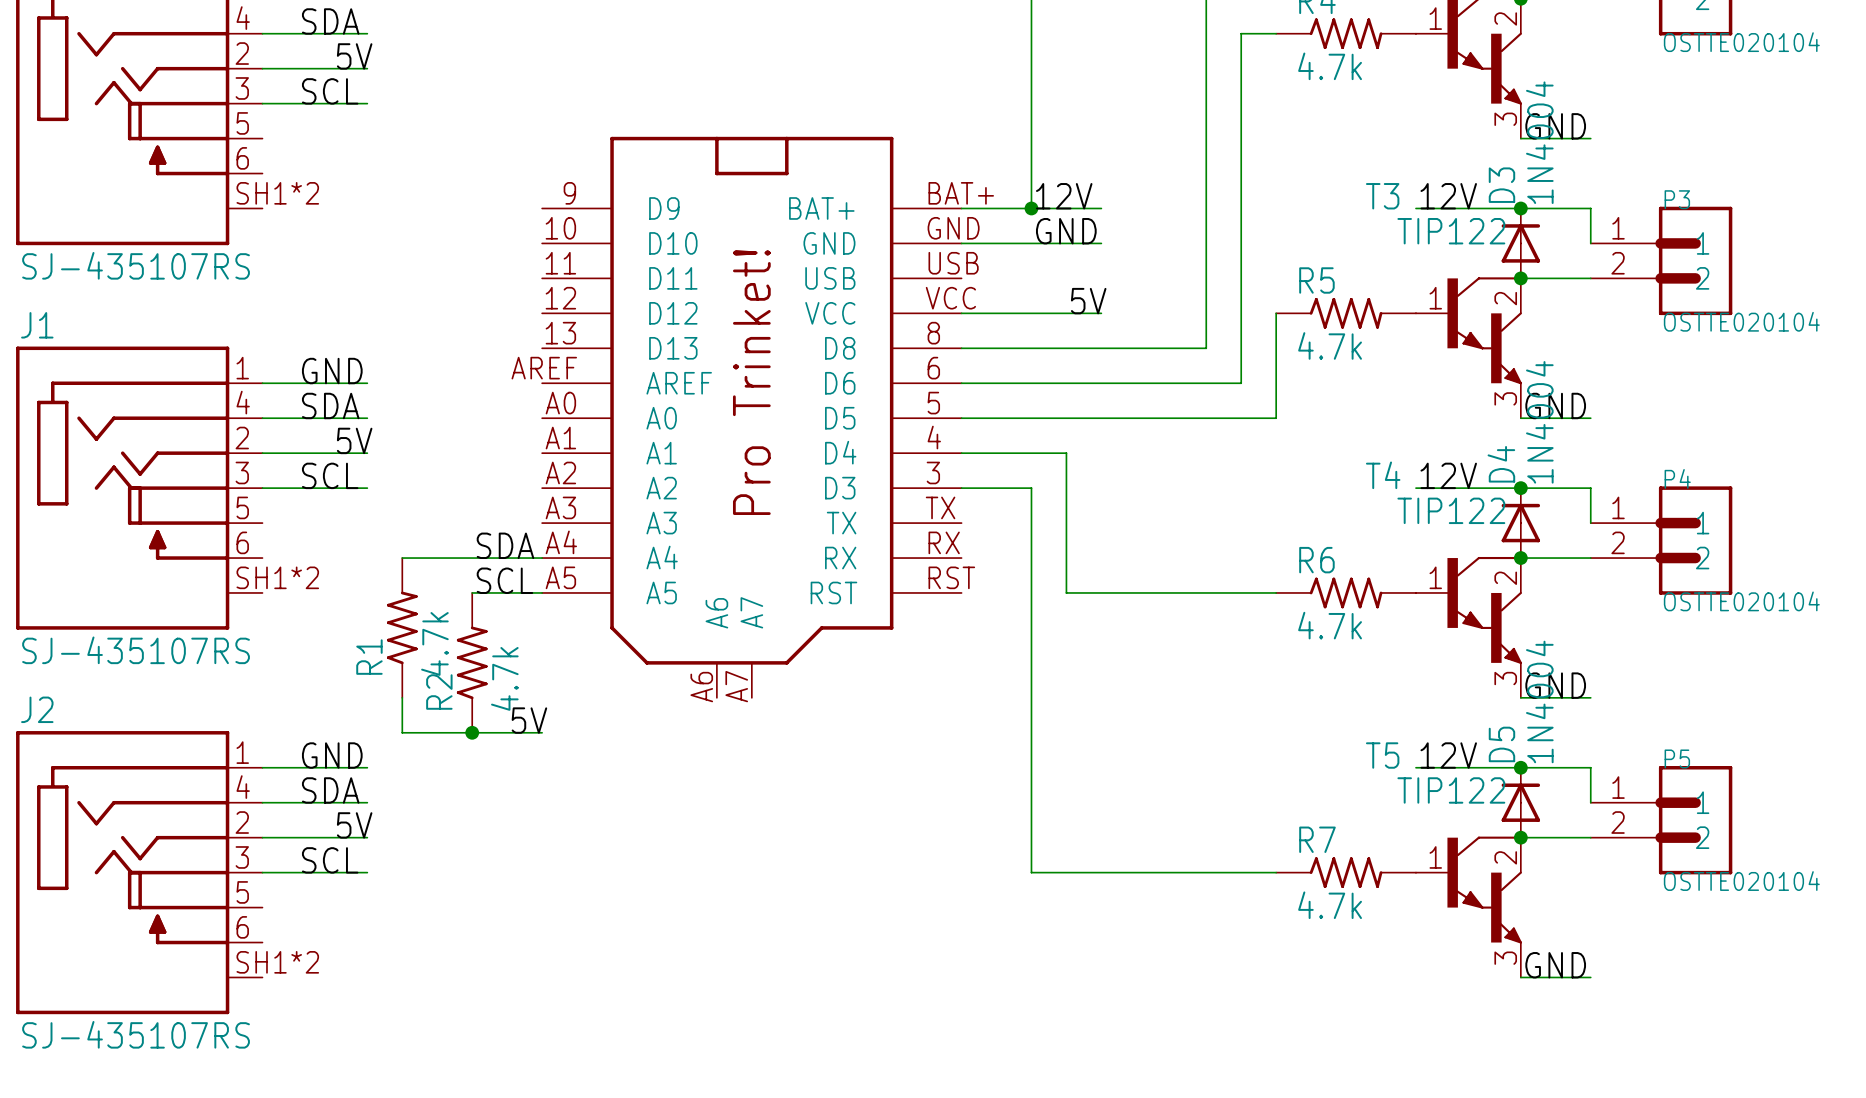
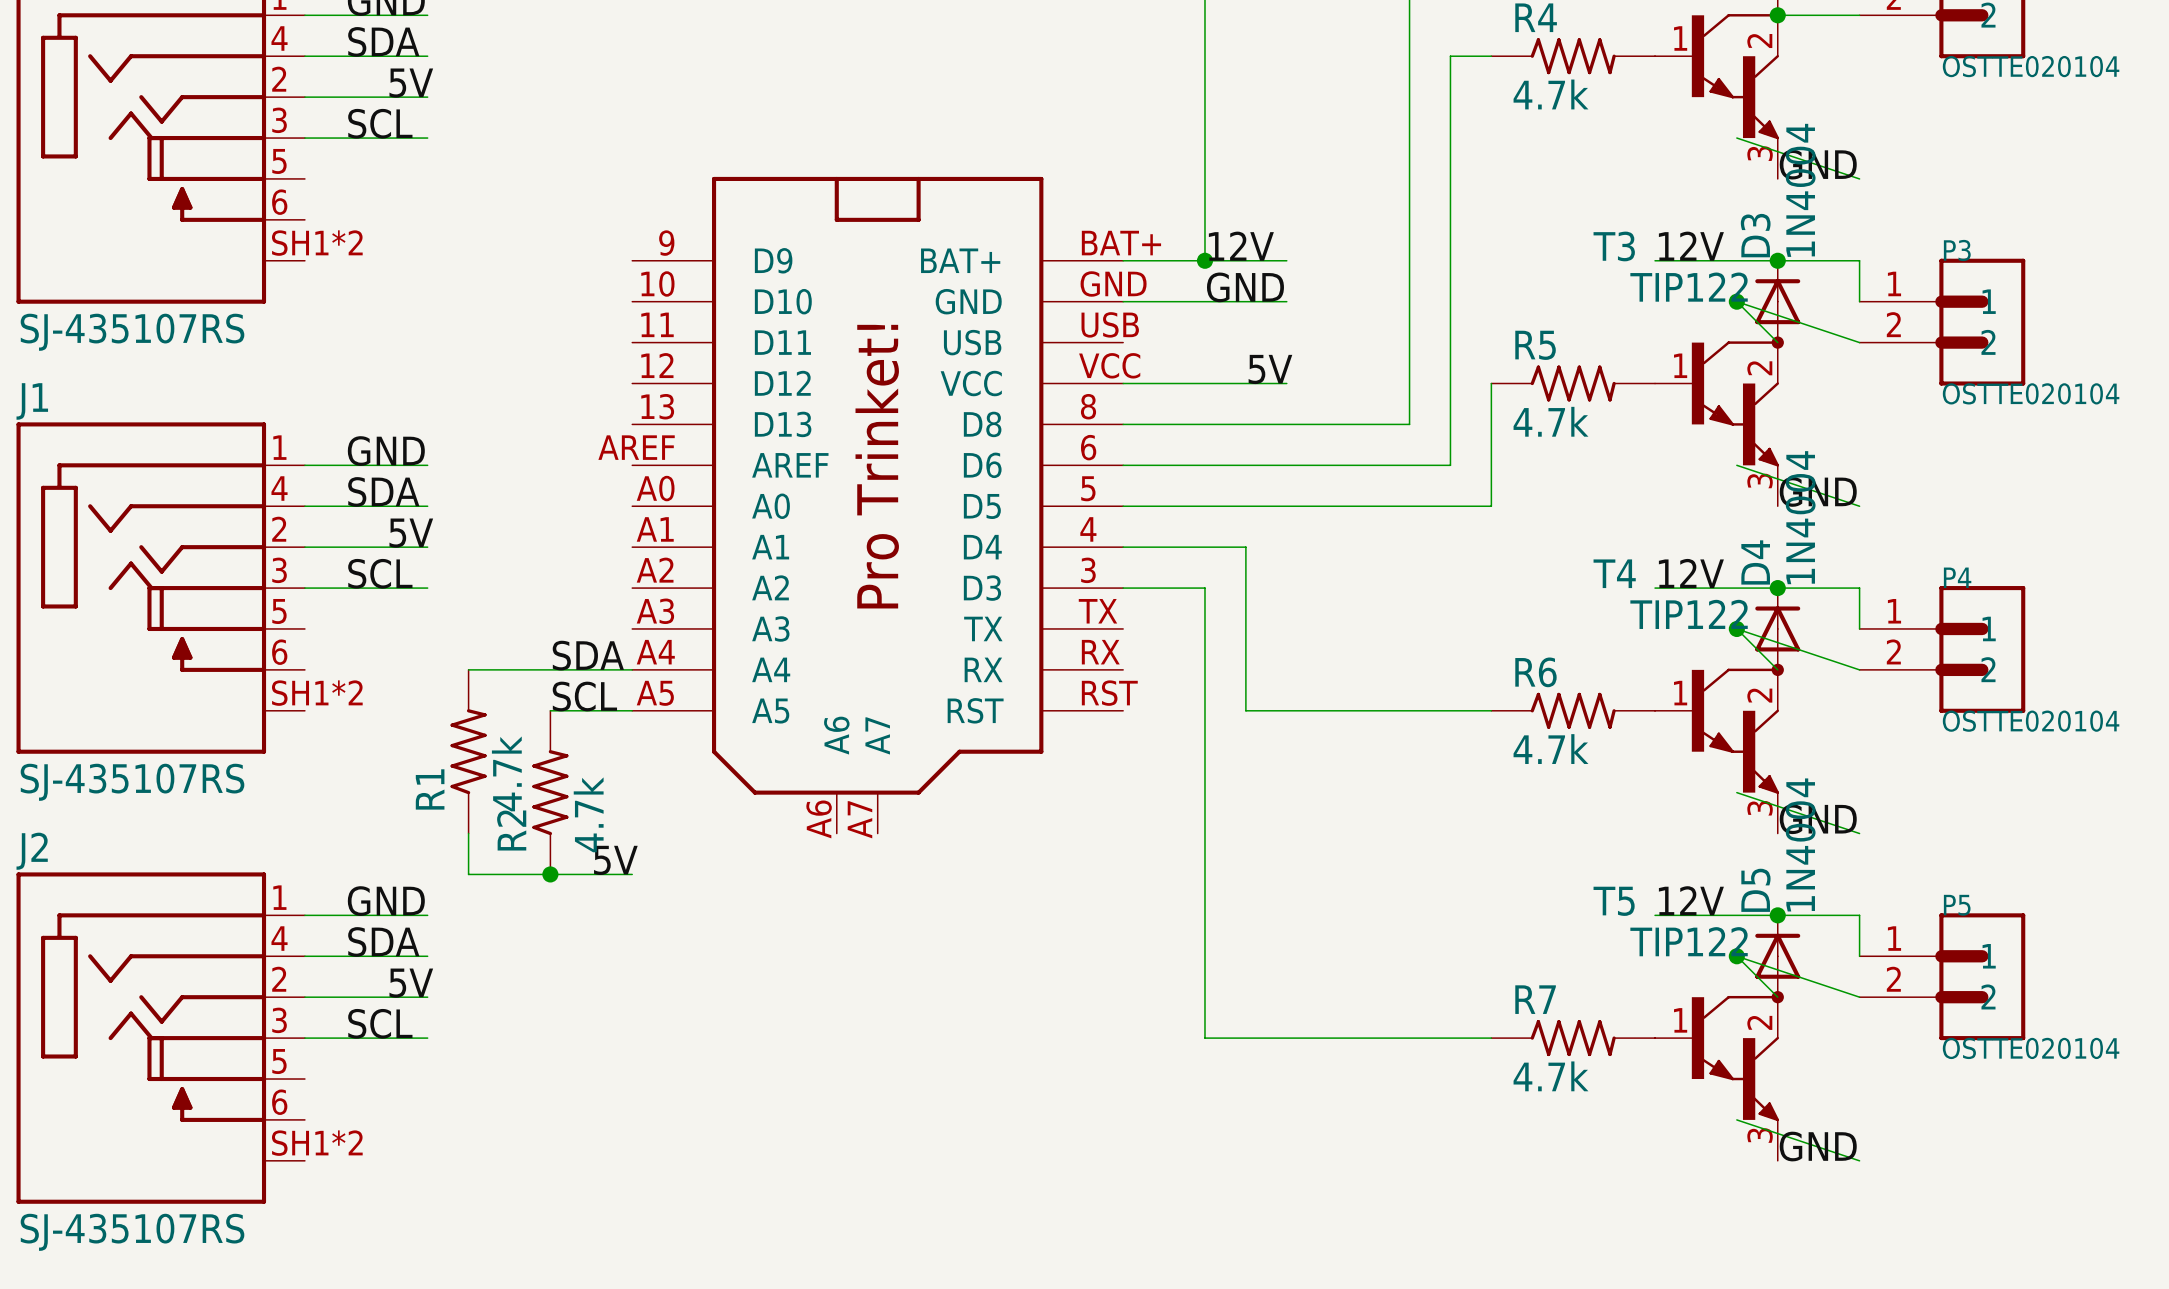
wire: (1520, 138) (1590, 138) -> (1736, 138) (1859, 178)
wire: (1520, 278) (1590, 278) -> (1777, 342) (1736, 301) (1859, 342)
junction position: (1520, 278) -> (1736, 301)
wire: (1520, 418) (1590, 418) -> (1736, 465) (1859, 506)
wire: (1520, 558) (1590, 558) -> (1777, 669) (1736, 628) (1859, 669)
junction position: (1520, 558) -> (1736, 628)
wire: (1520, 697) (1590, 697) -> (1736, 792) (1859, 833)
wire: (1520, 837) (1590, 837) -> (1777, 997) (1736, 956) (1859, 997)
junction position: (1520, 837) -> (1736, 956)
wire: (1520, 977) (1590, 977) -> (1736, 1119) (1859, 1160)

